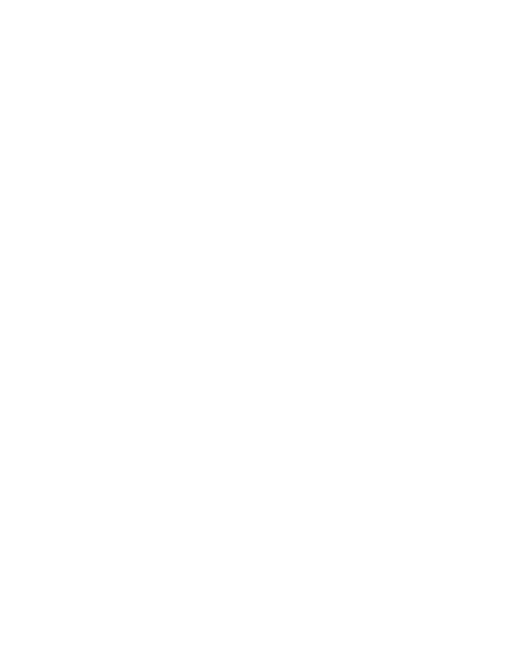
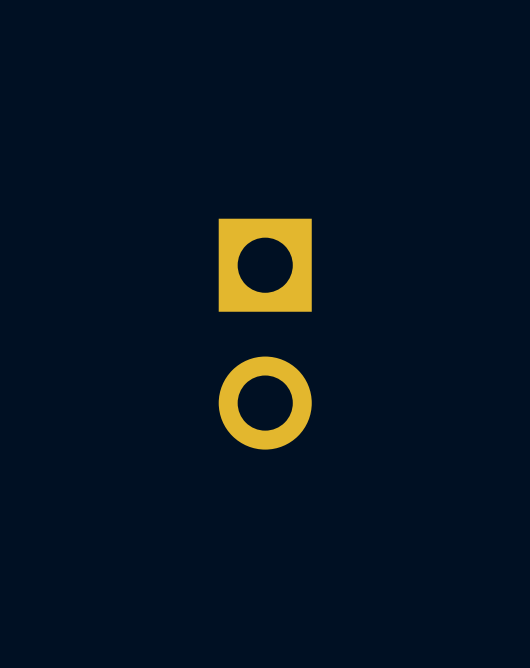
part: none -> (265, 334)

